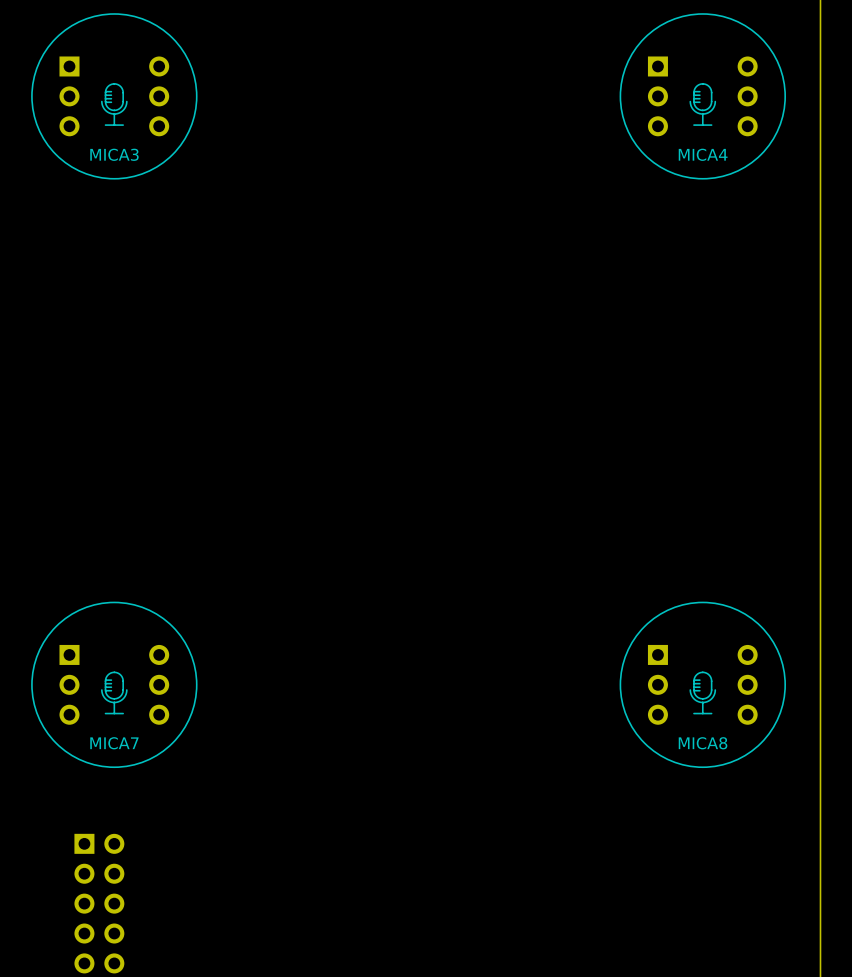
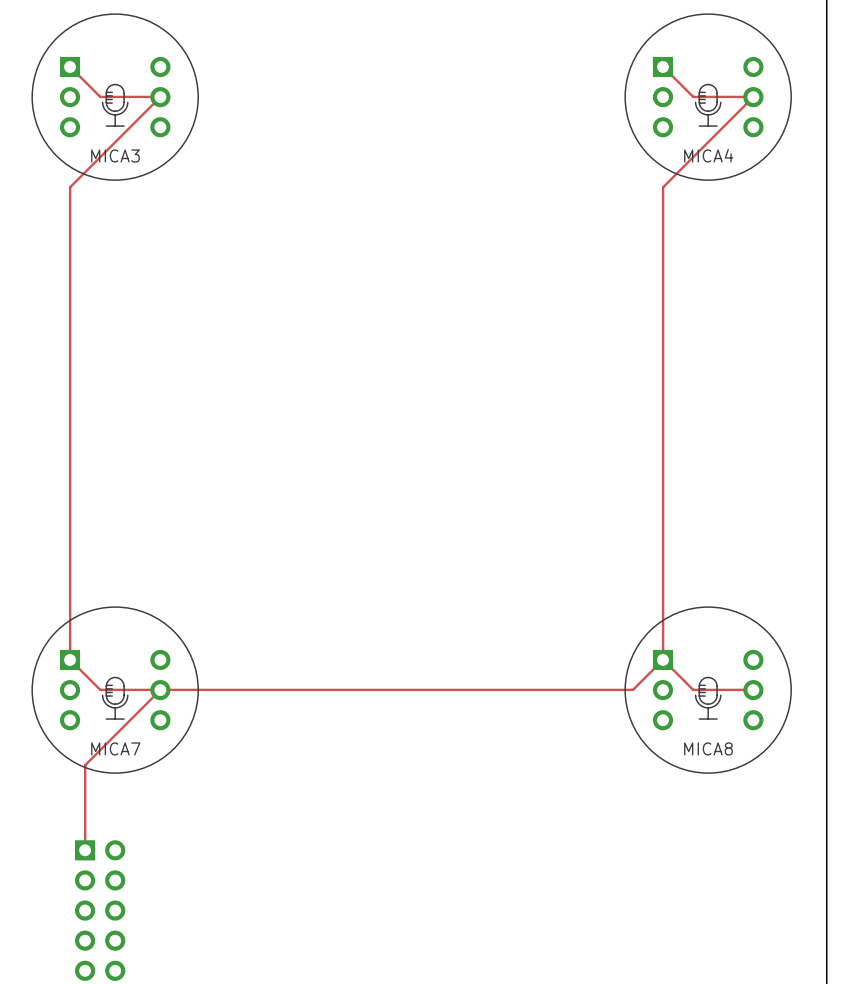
track: none -> (70, 66) (100, 96) (160, 96) (70, 187) (70, 659) (100, 689) (632, 689) (663, 659)
track: none -> (663, 66) (693, 96) (753, 96) (663, 187) (663, 659)
track: none -> (663, 659) (693, 689) (753, 689)
track: none -> (160, 689) (85, 765) (85, 850)

